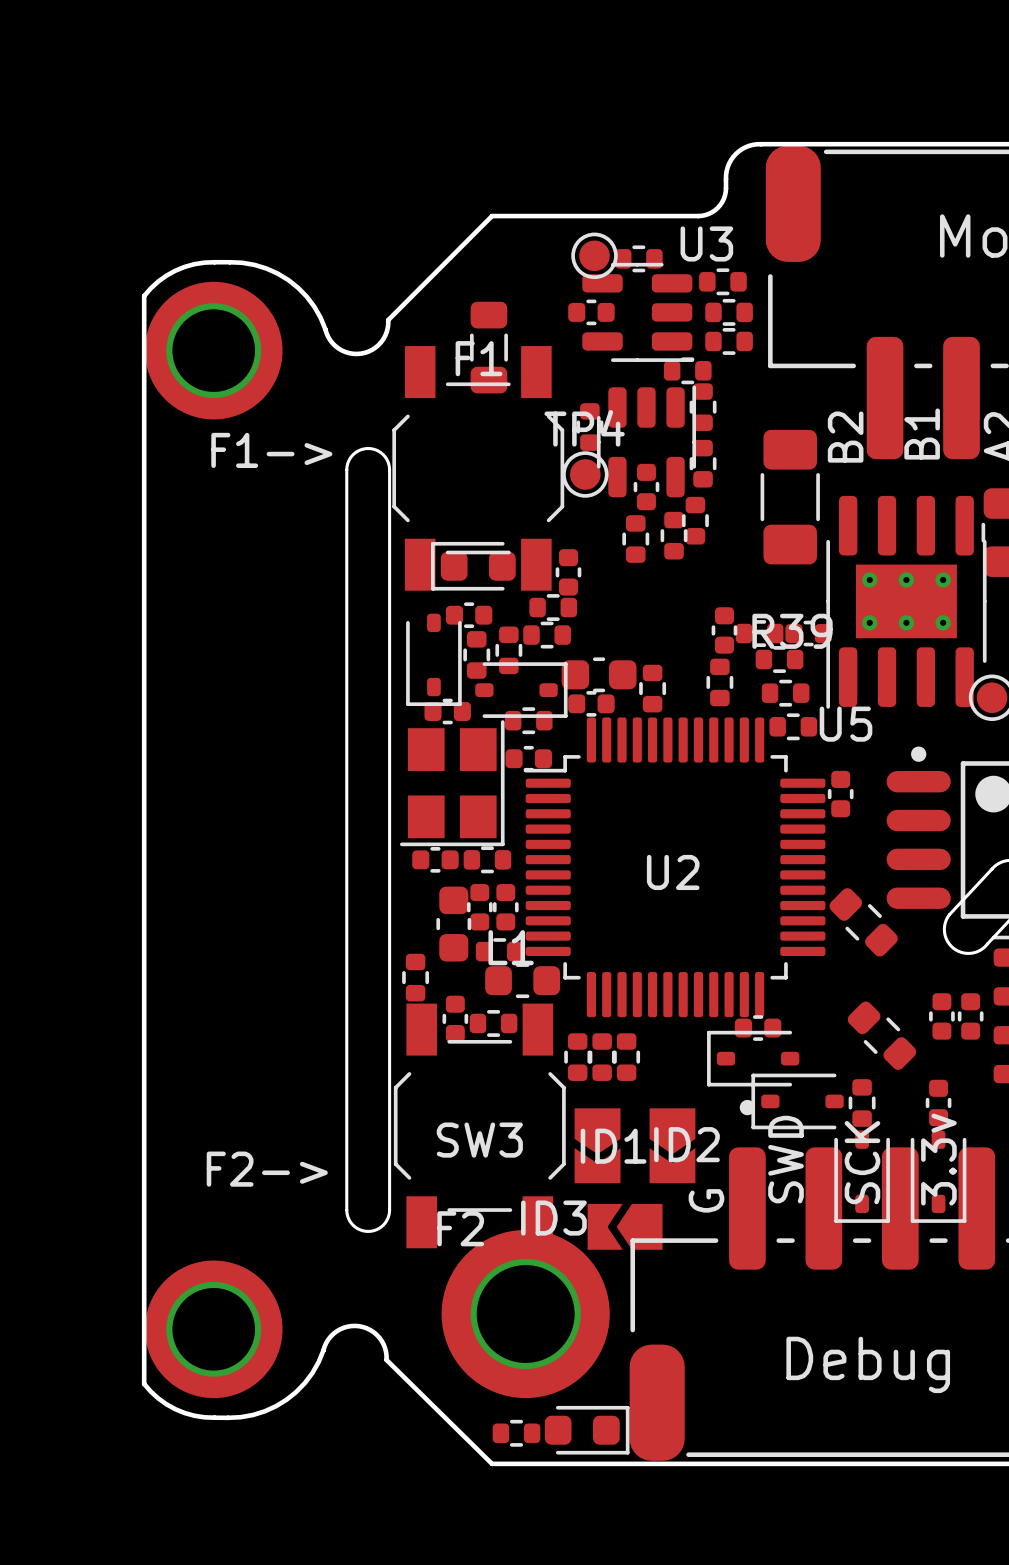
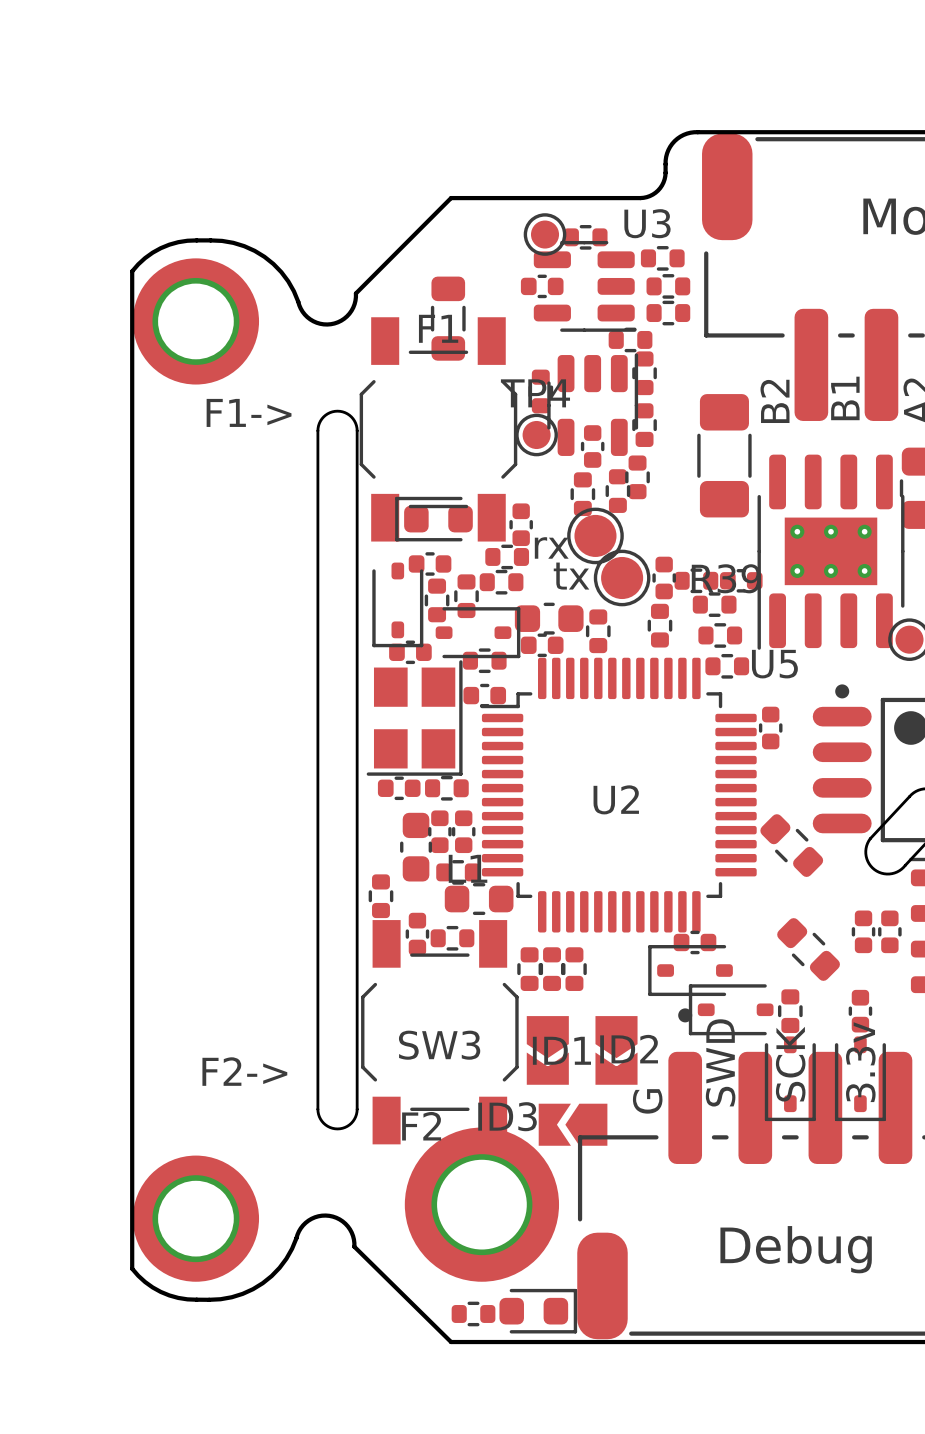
part: none -> (595, 535)
part: none -> (622, 577)

